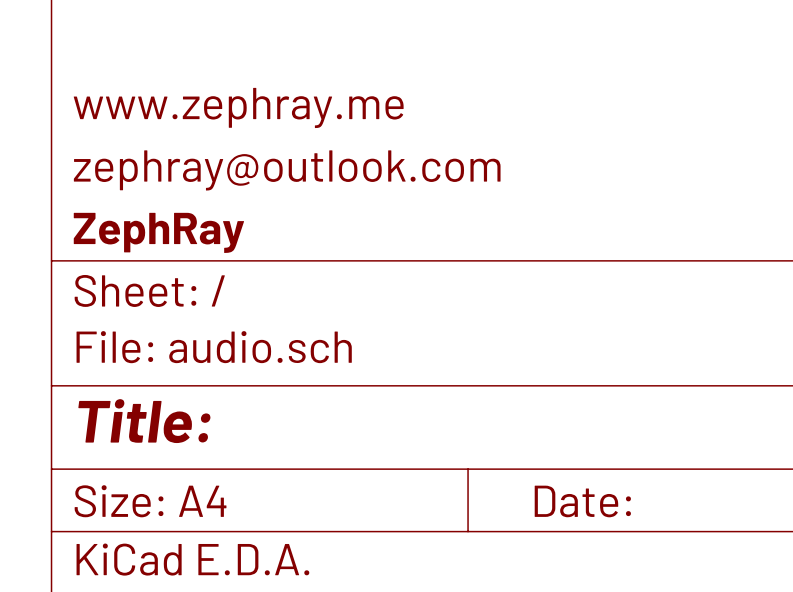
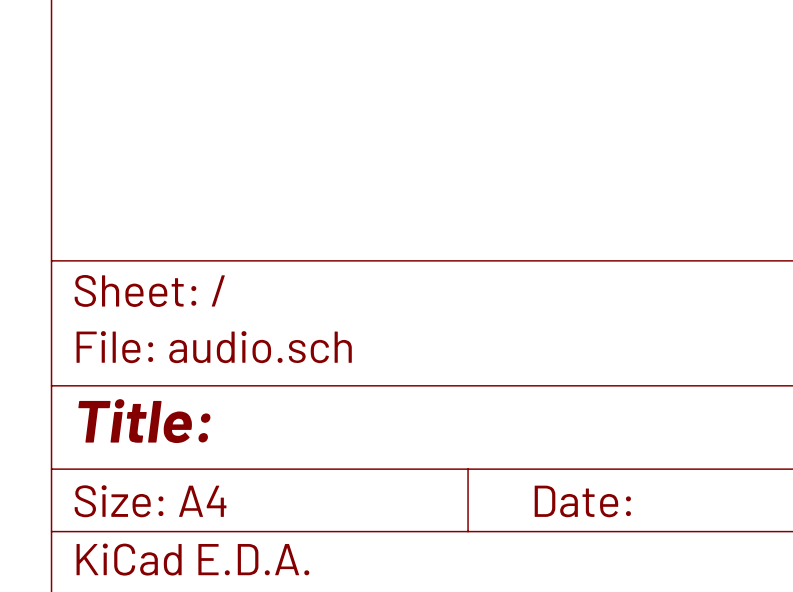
title block: www.zephray.me (238, 107) -> none
title block: zephray@outlook.com (287, 170) -> none
title block: ZephRay (158, 232) -> none

